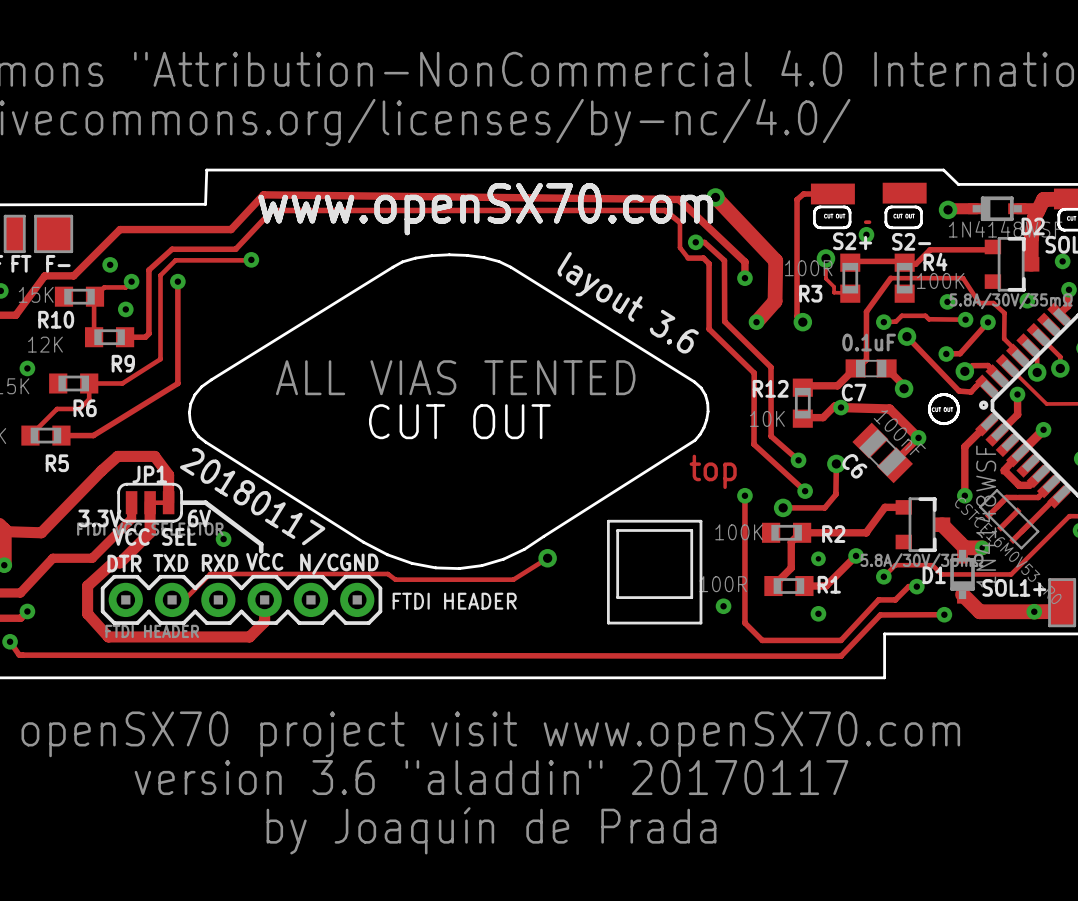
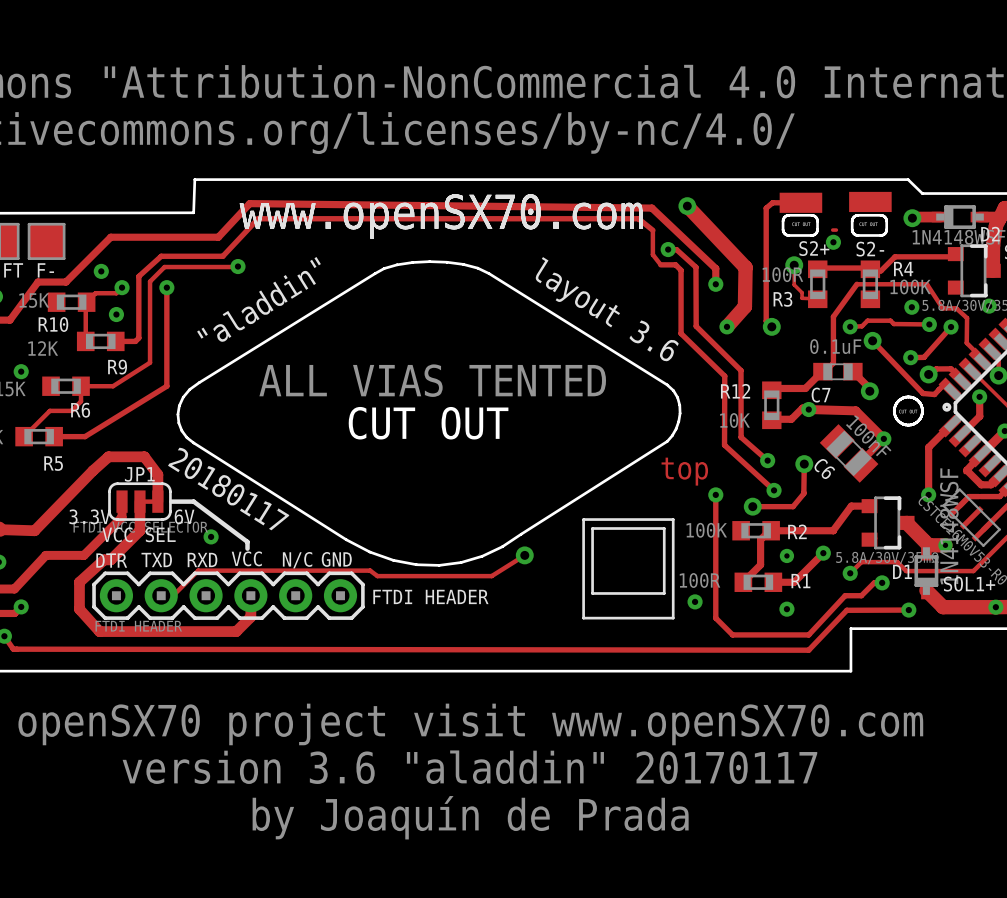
text: none -> "aladdin" (258, 299)

